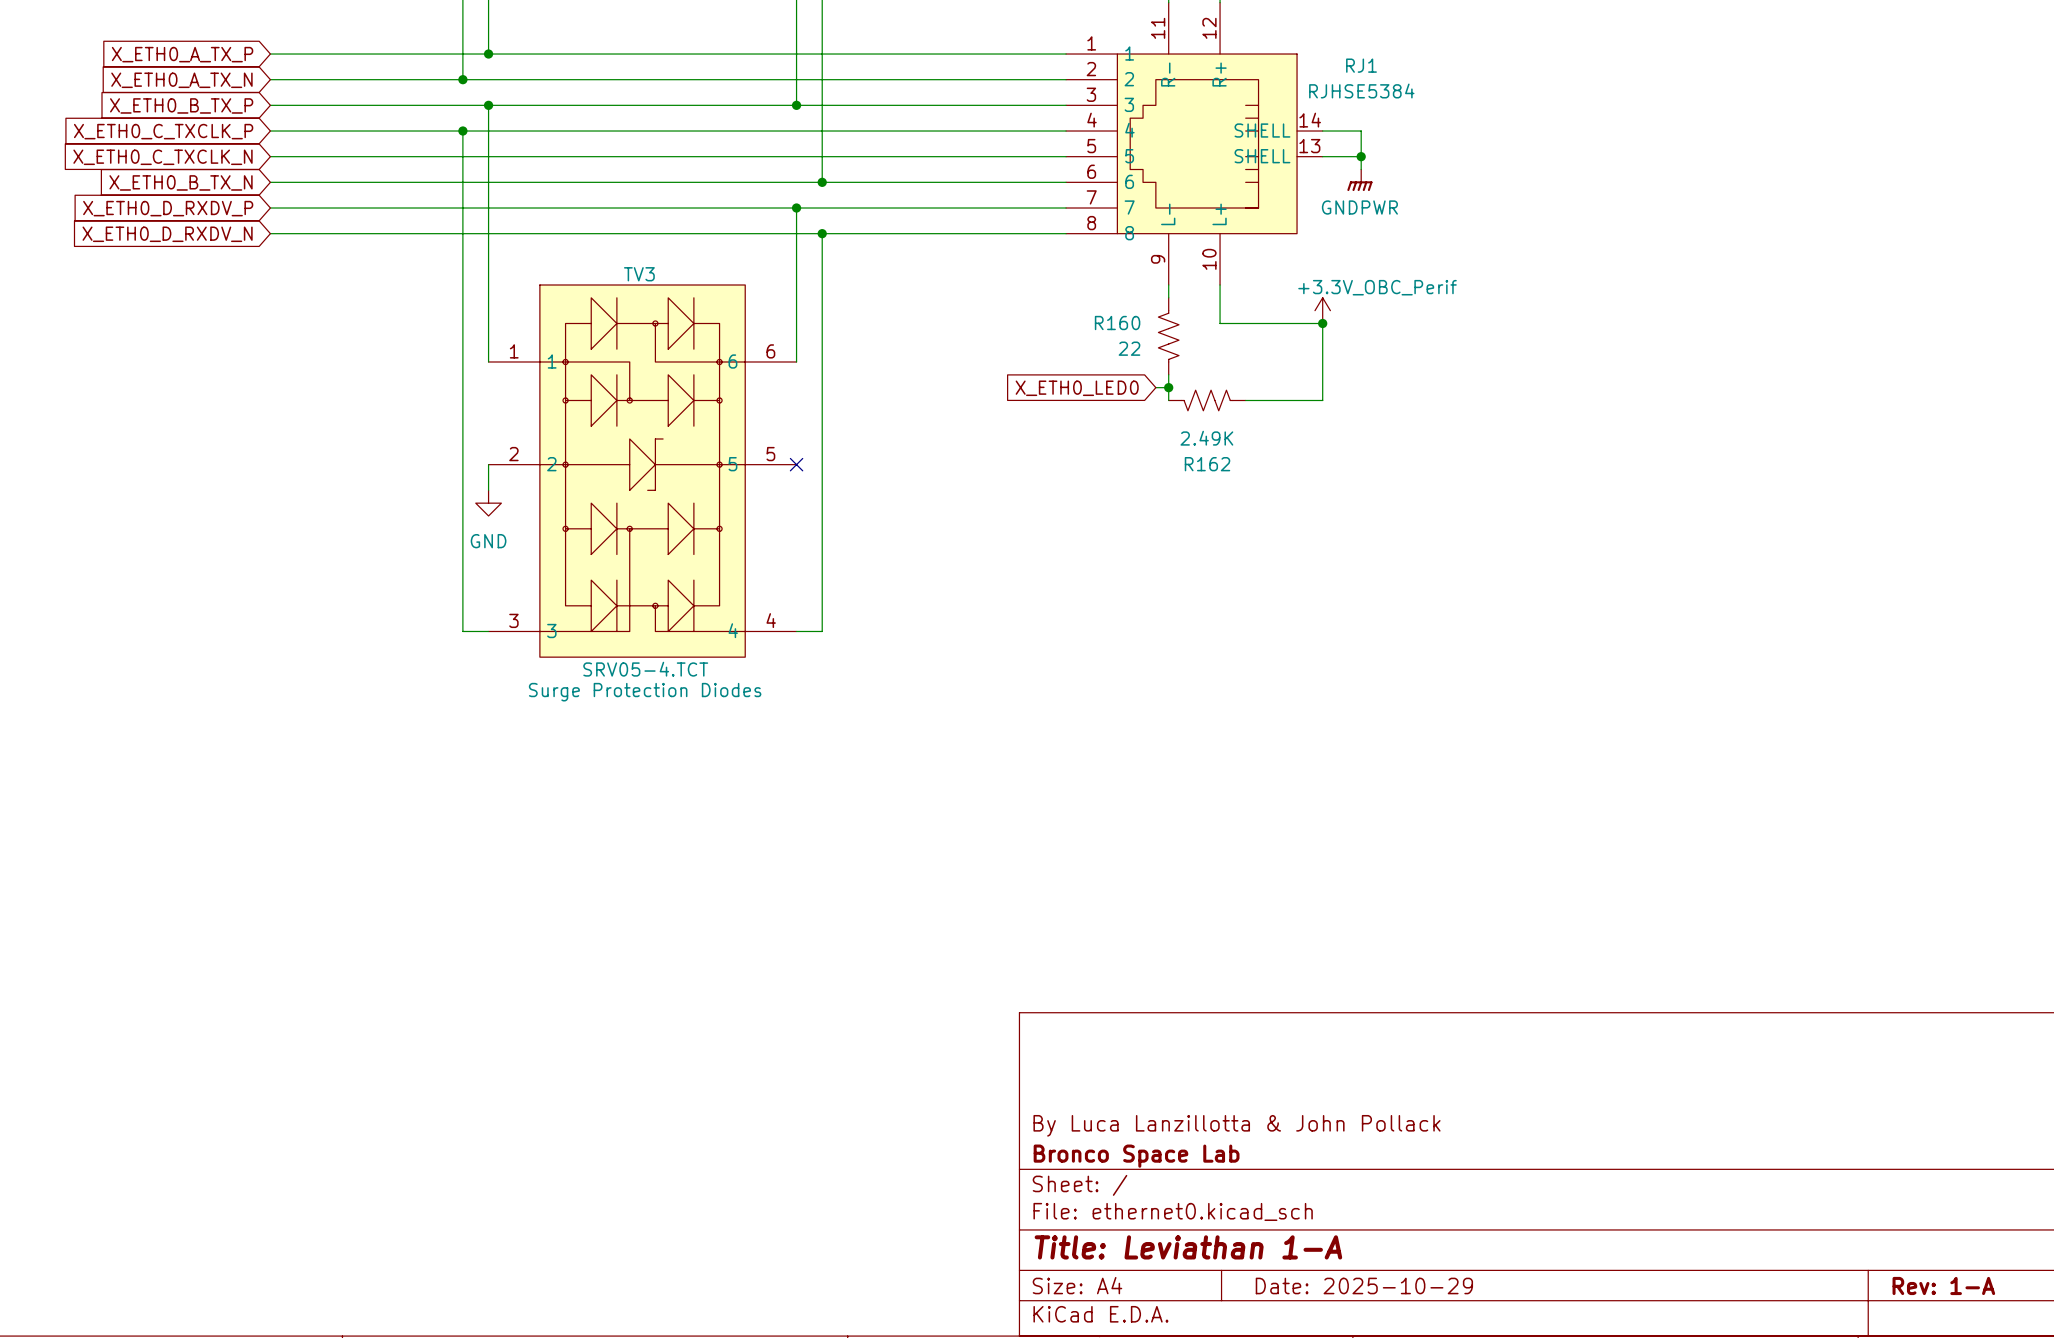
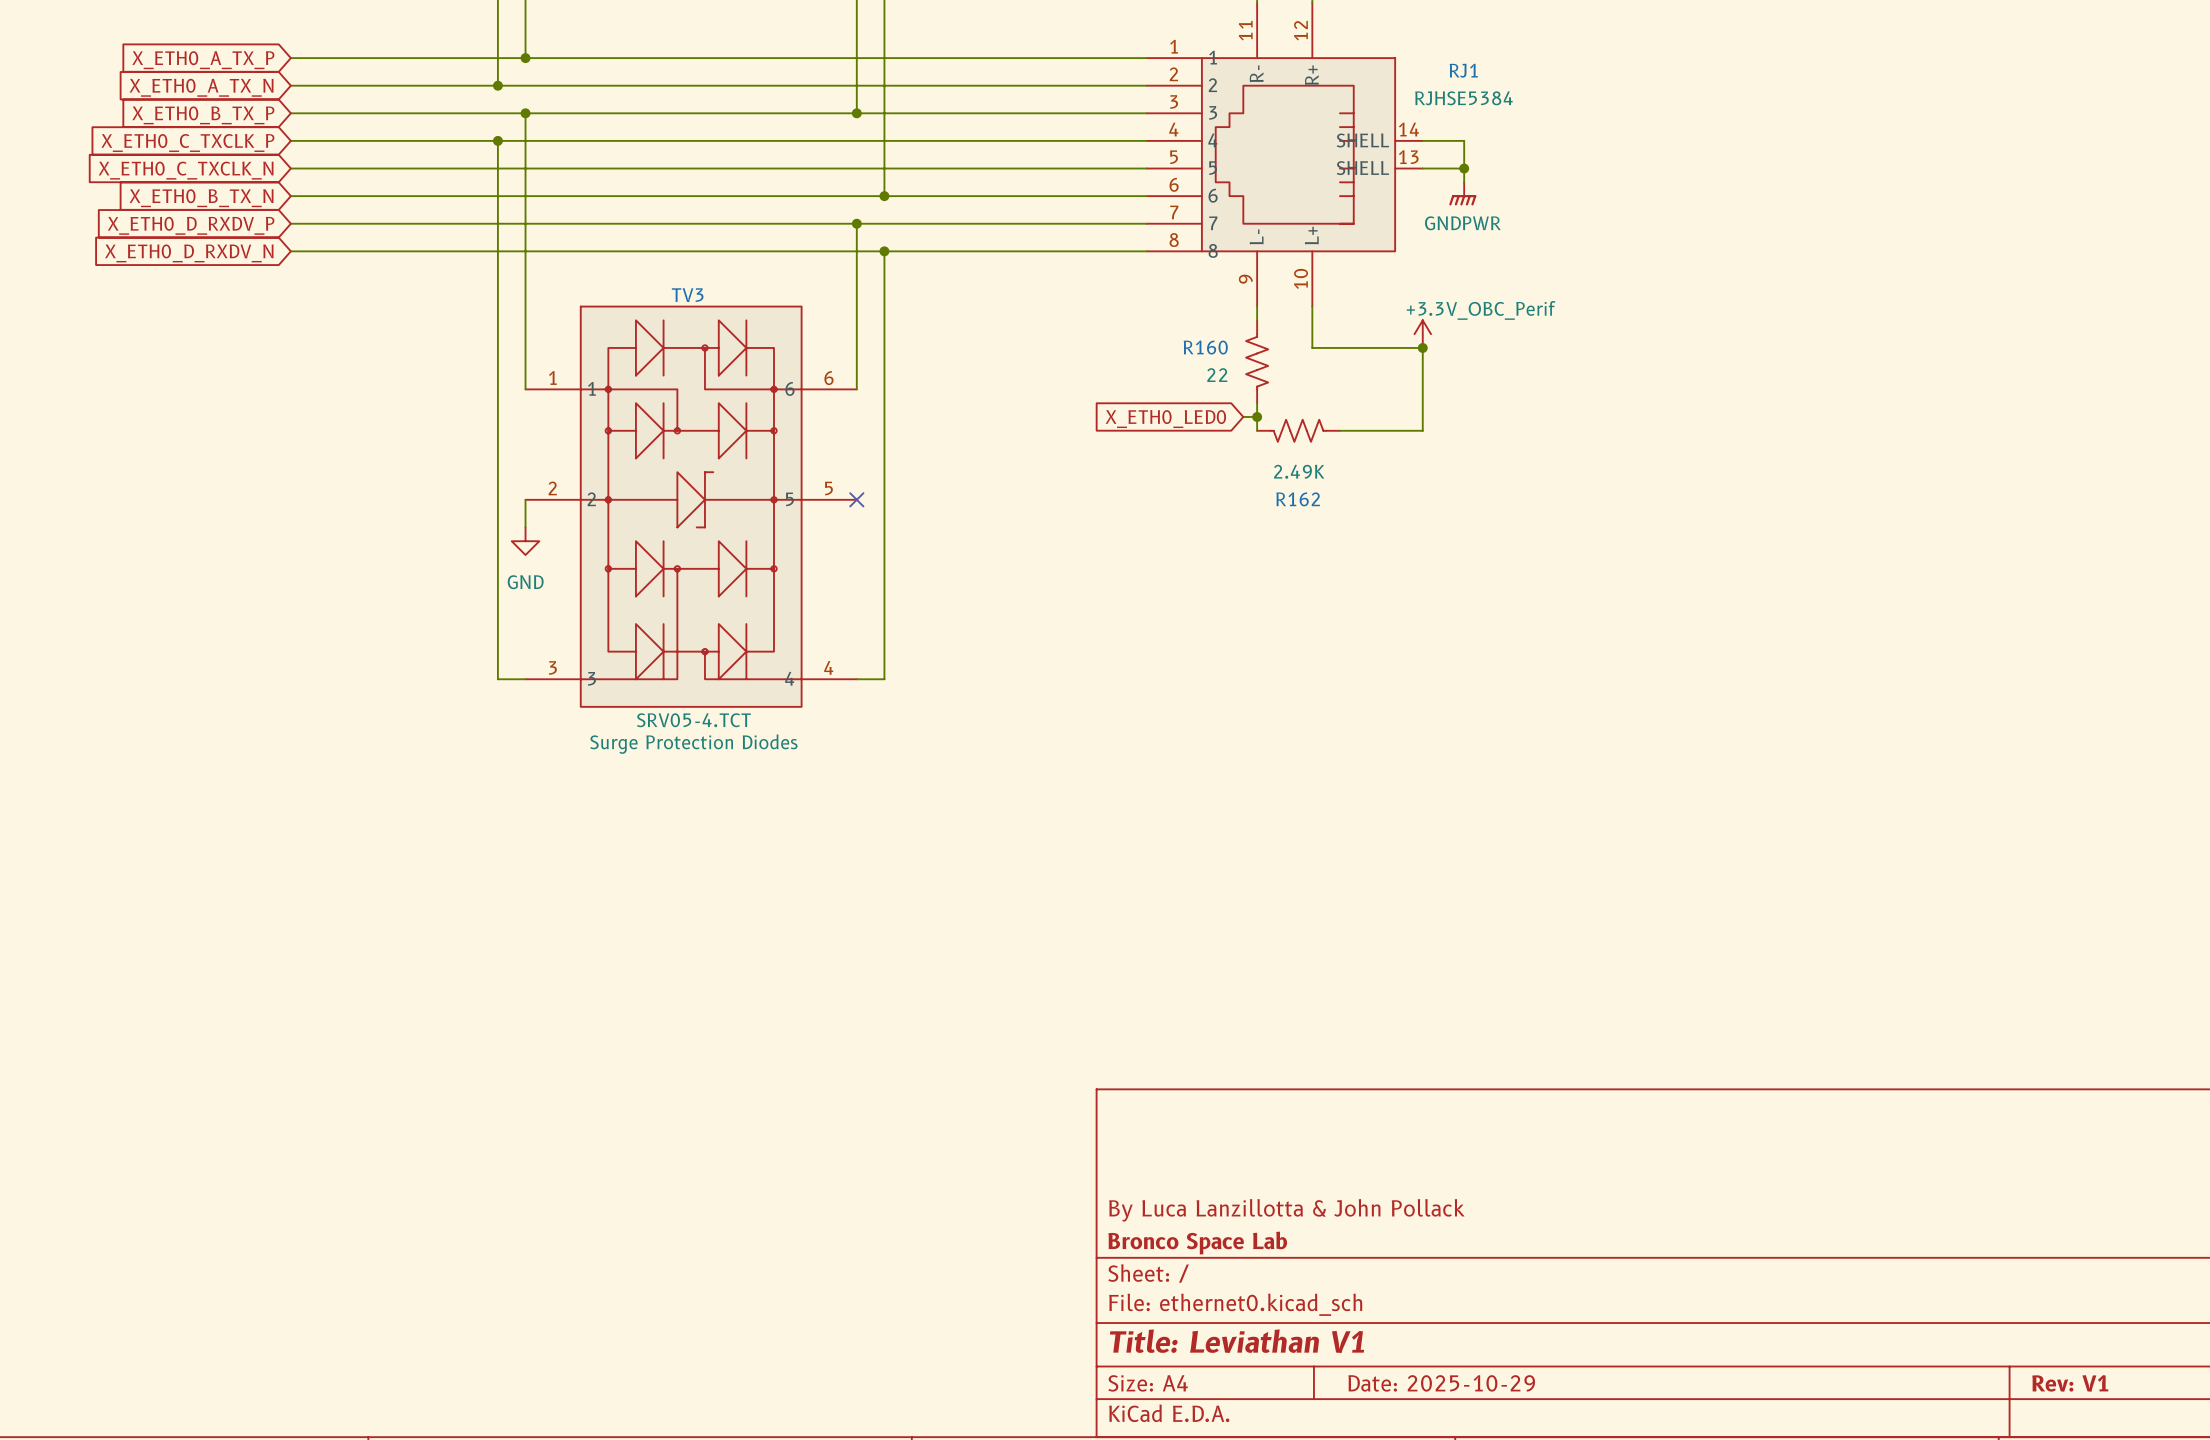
title block: Title: Leviathan 1-A (1188, 1247) -> Title: Leviathan V1 (1237, 1341)
title block: Rev: 1-A (1943, 1285) -> Rev: V1 (2070, 1383)

